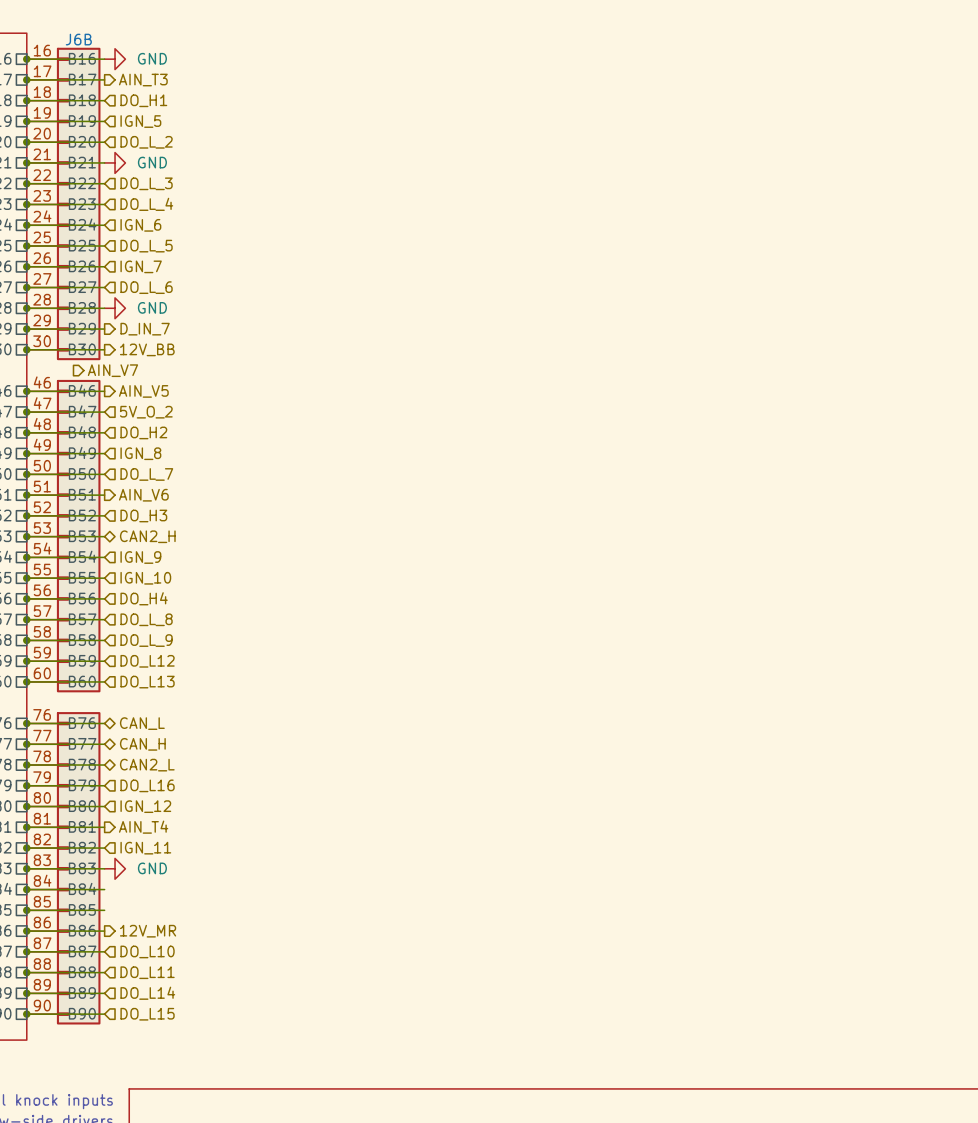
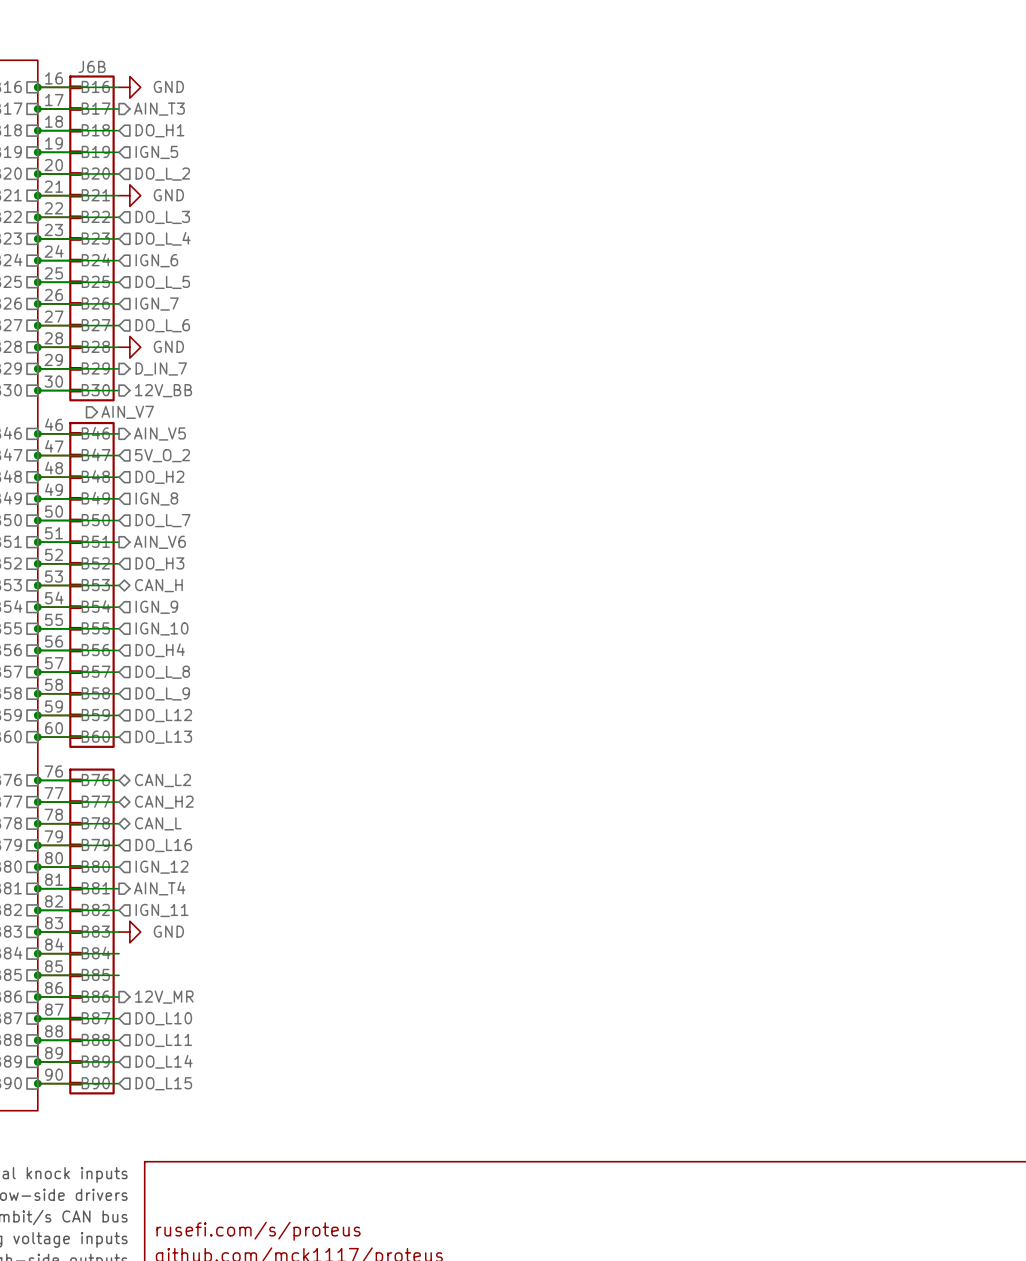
hierarchical label: CAN2_H (147, 536) -> CAN_H (158, 585)
hierarchical label: CAN_L (142, 723) -> CAN_L2 (163, 780)
hierarchical label: CAN_H (142, 744) -> CAN_H2 (164, 802)
hierarchical label: CAN2_L (147, 765) -> CAN_L (158, 823)

